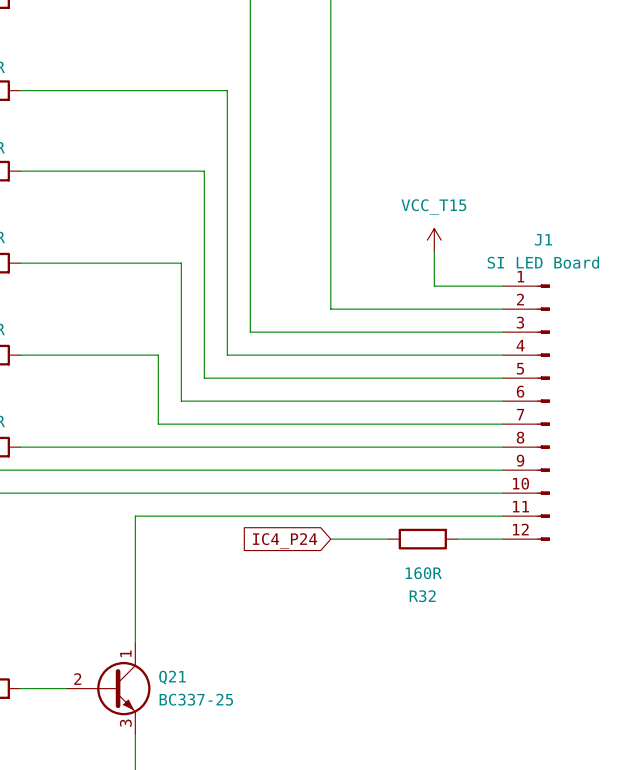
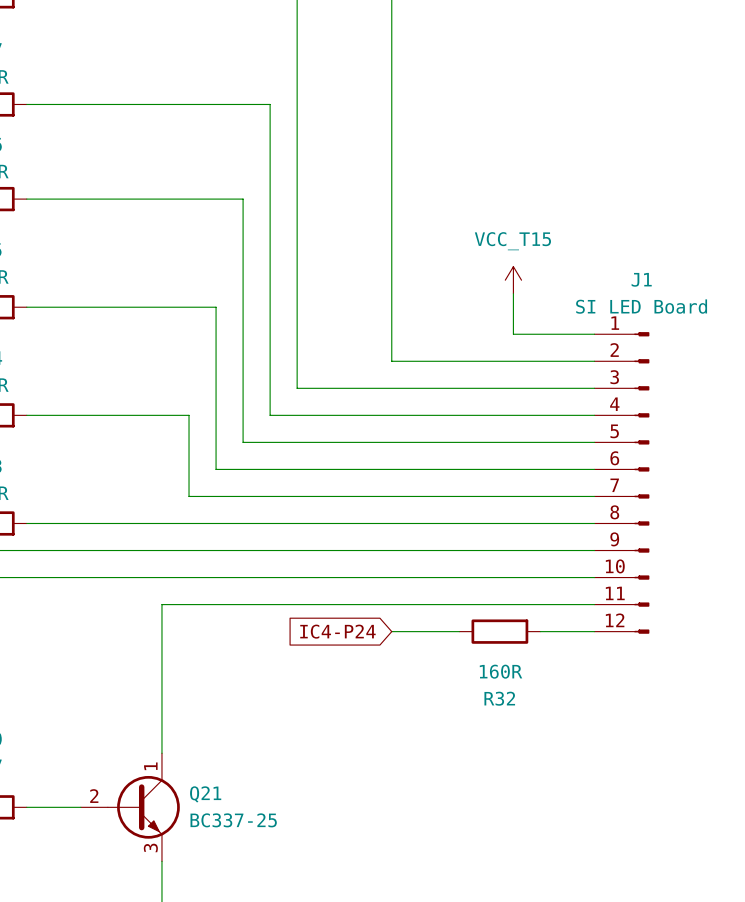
global label: IC4_P24 (285, 540) -> IC4-P24 (337, 631)

